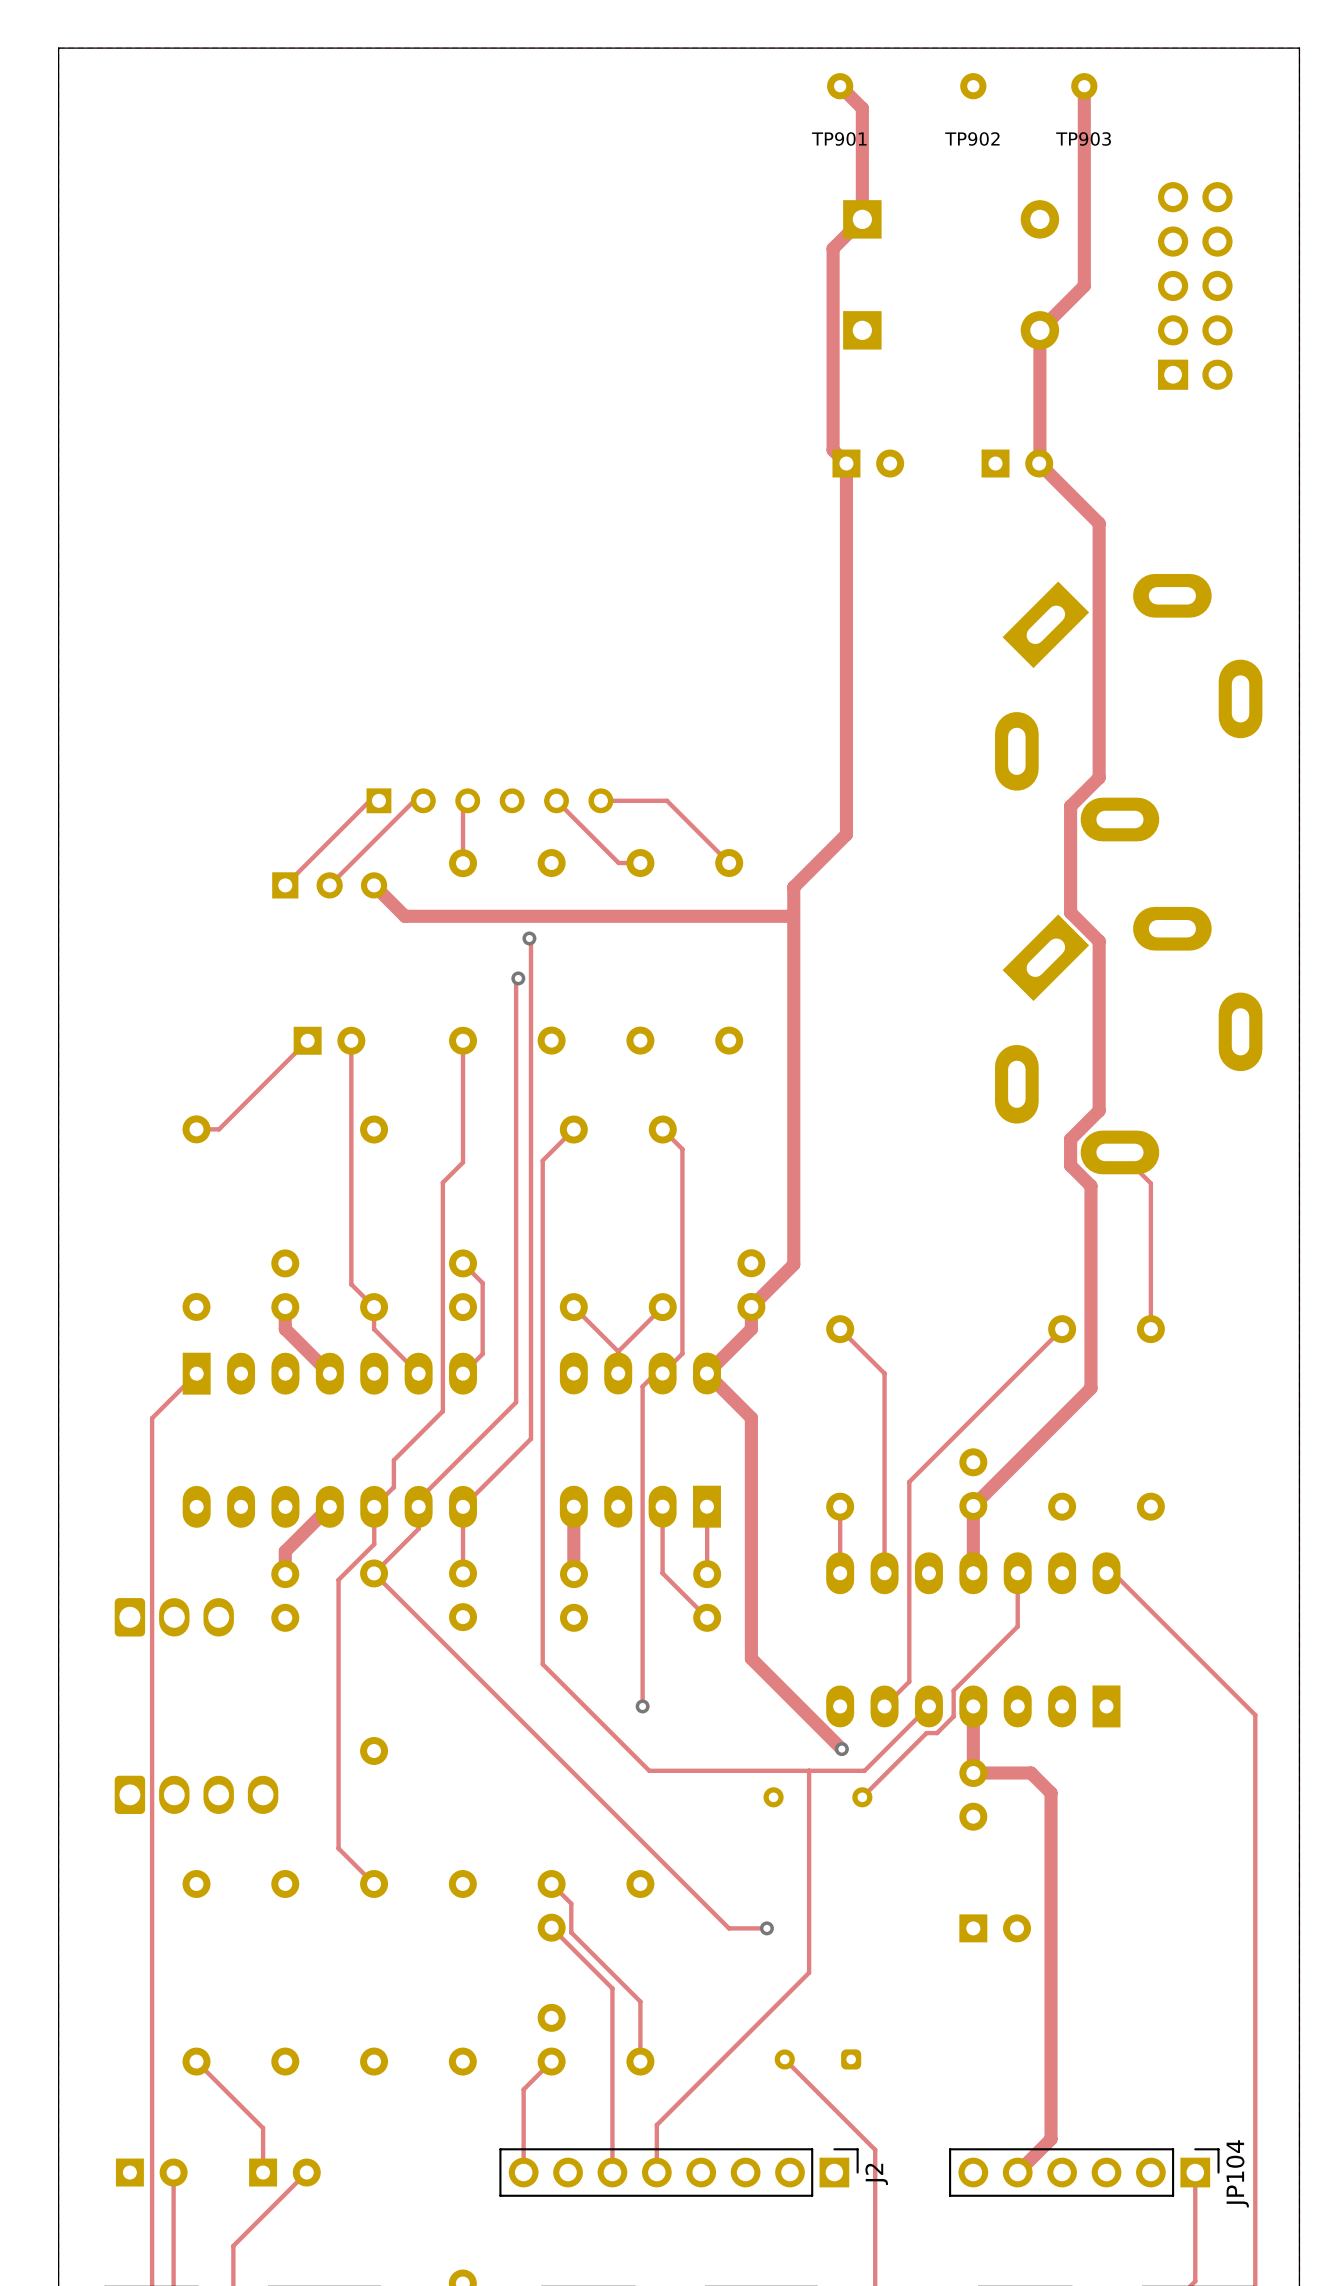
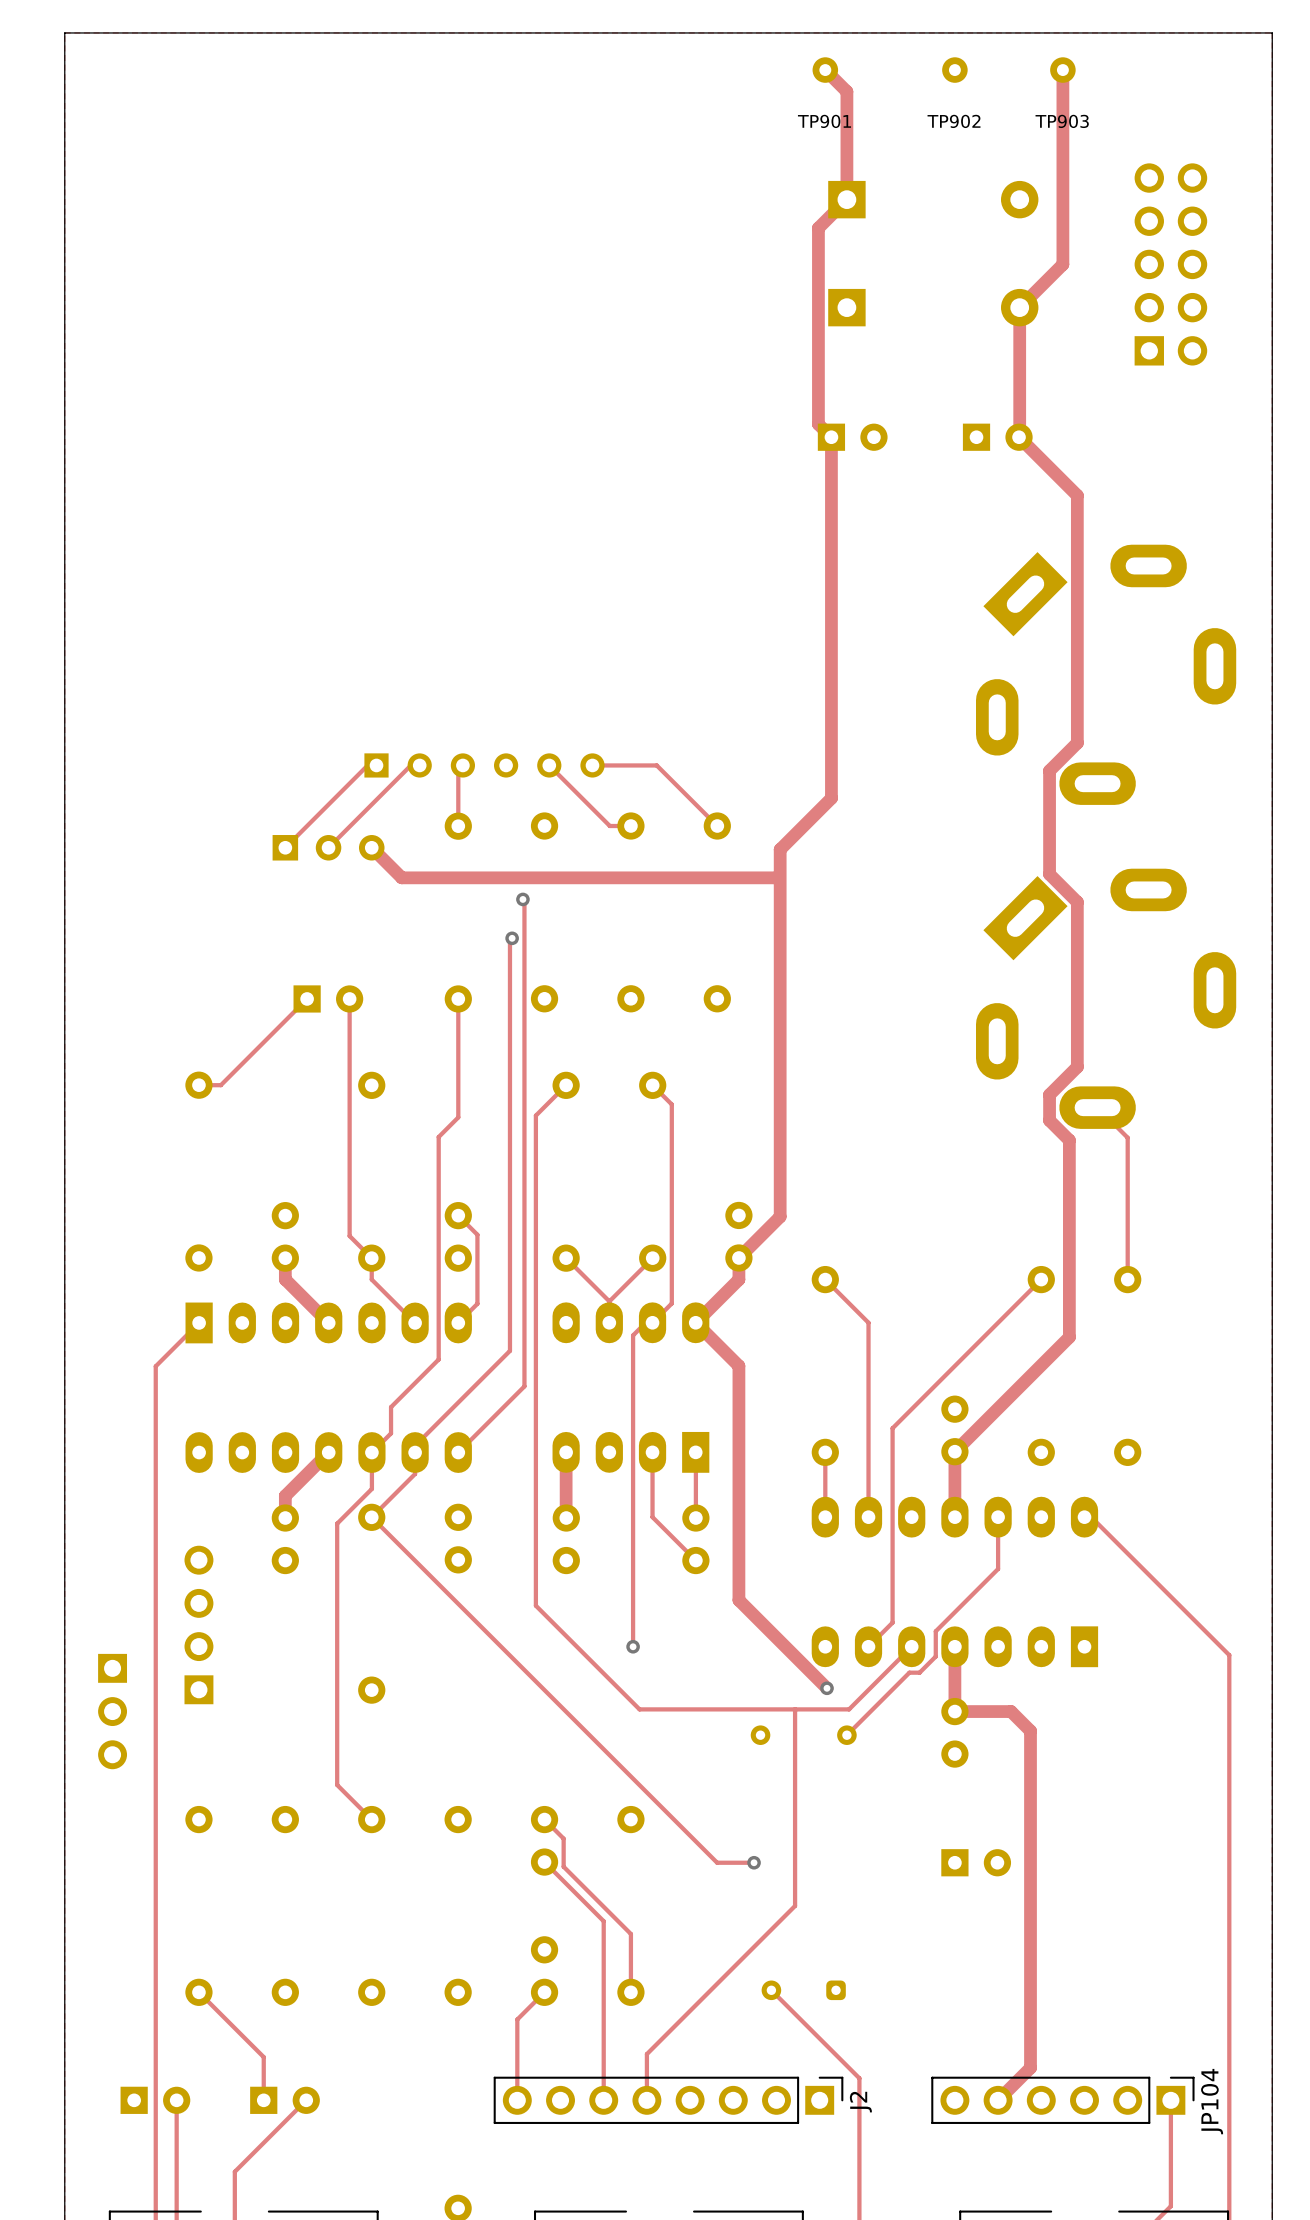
track: (463, 1506) (463, 1573) -> none
part: (174, 1617) -> none
part: none -> (198, 1624)
part: none -> (112, 1711)
part: (196, 1794) -> none

